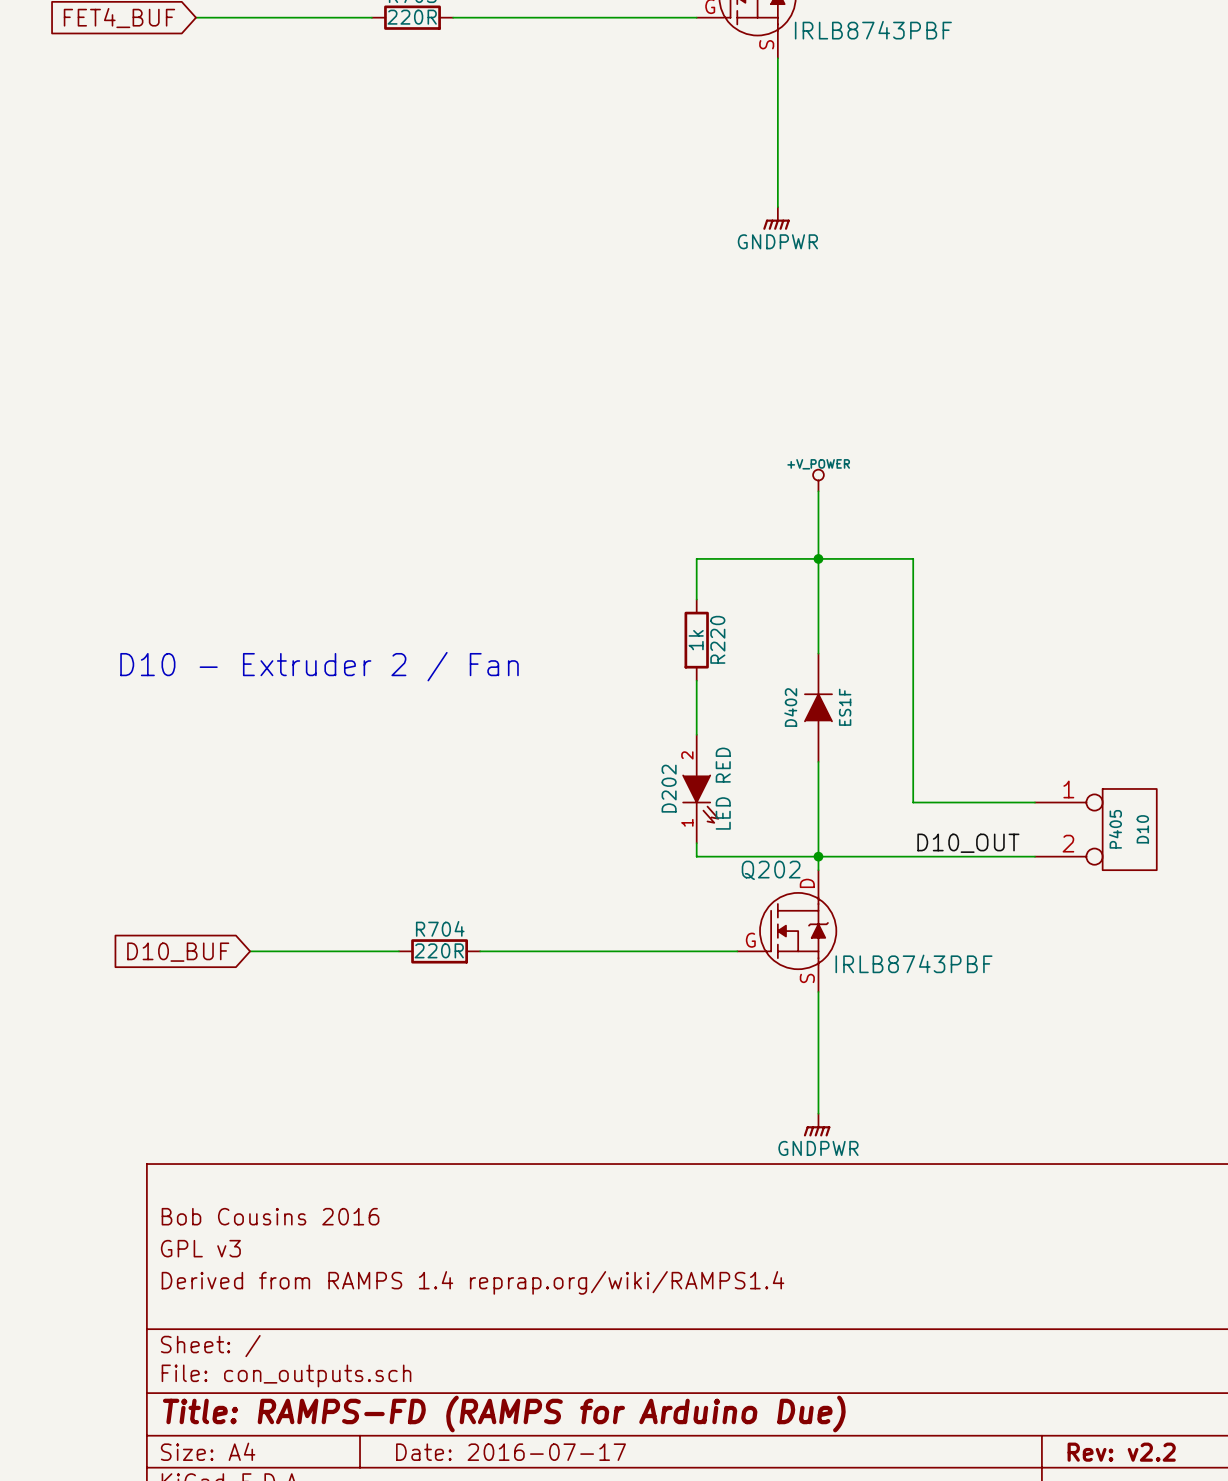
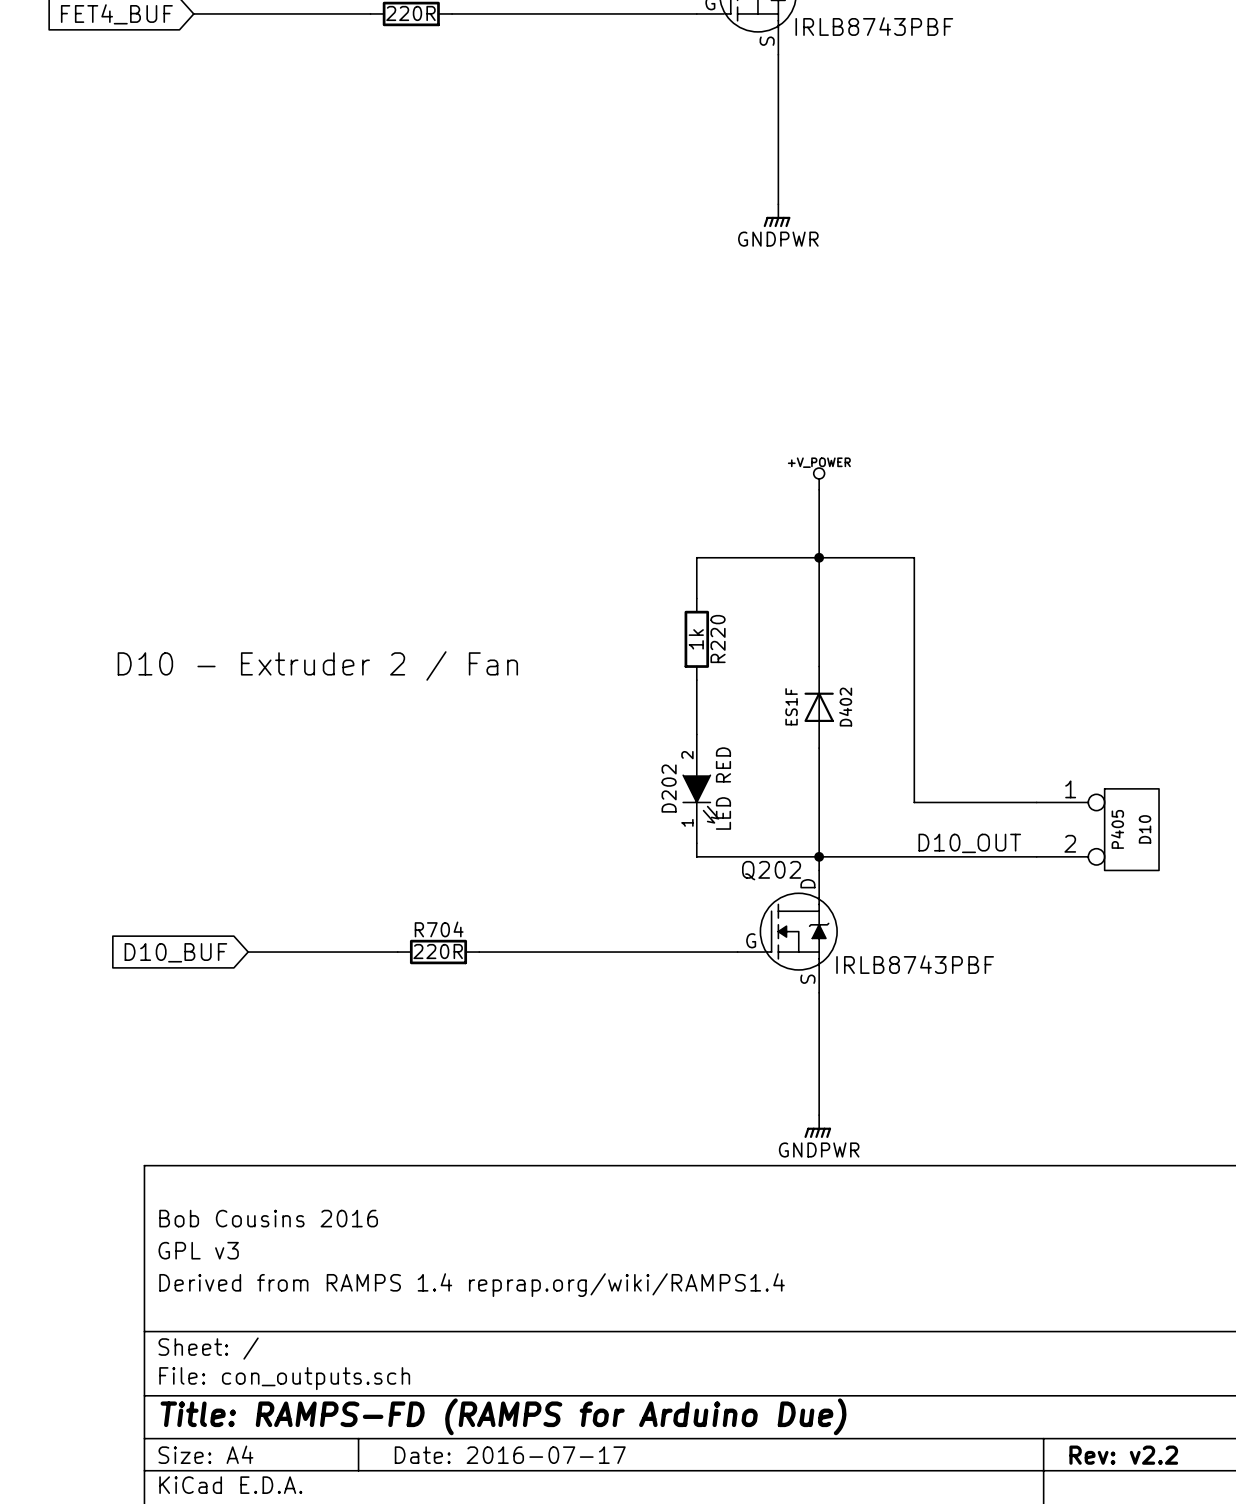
D402 symbol: [804, 653, 833, 762] -> [804, 666, 834, 749]
D402 name position: D402 (790, 707) -> D402 (845, 707)
D402 value position: ES1F (845, 707) -> ES1F (791, 706)

